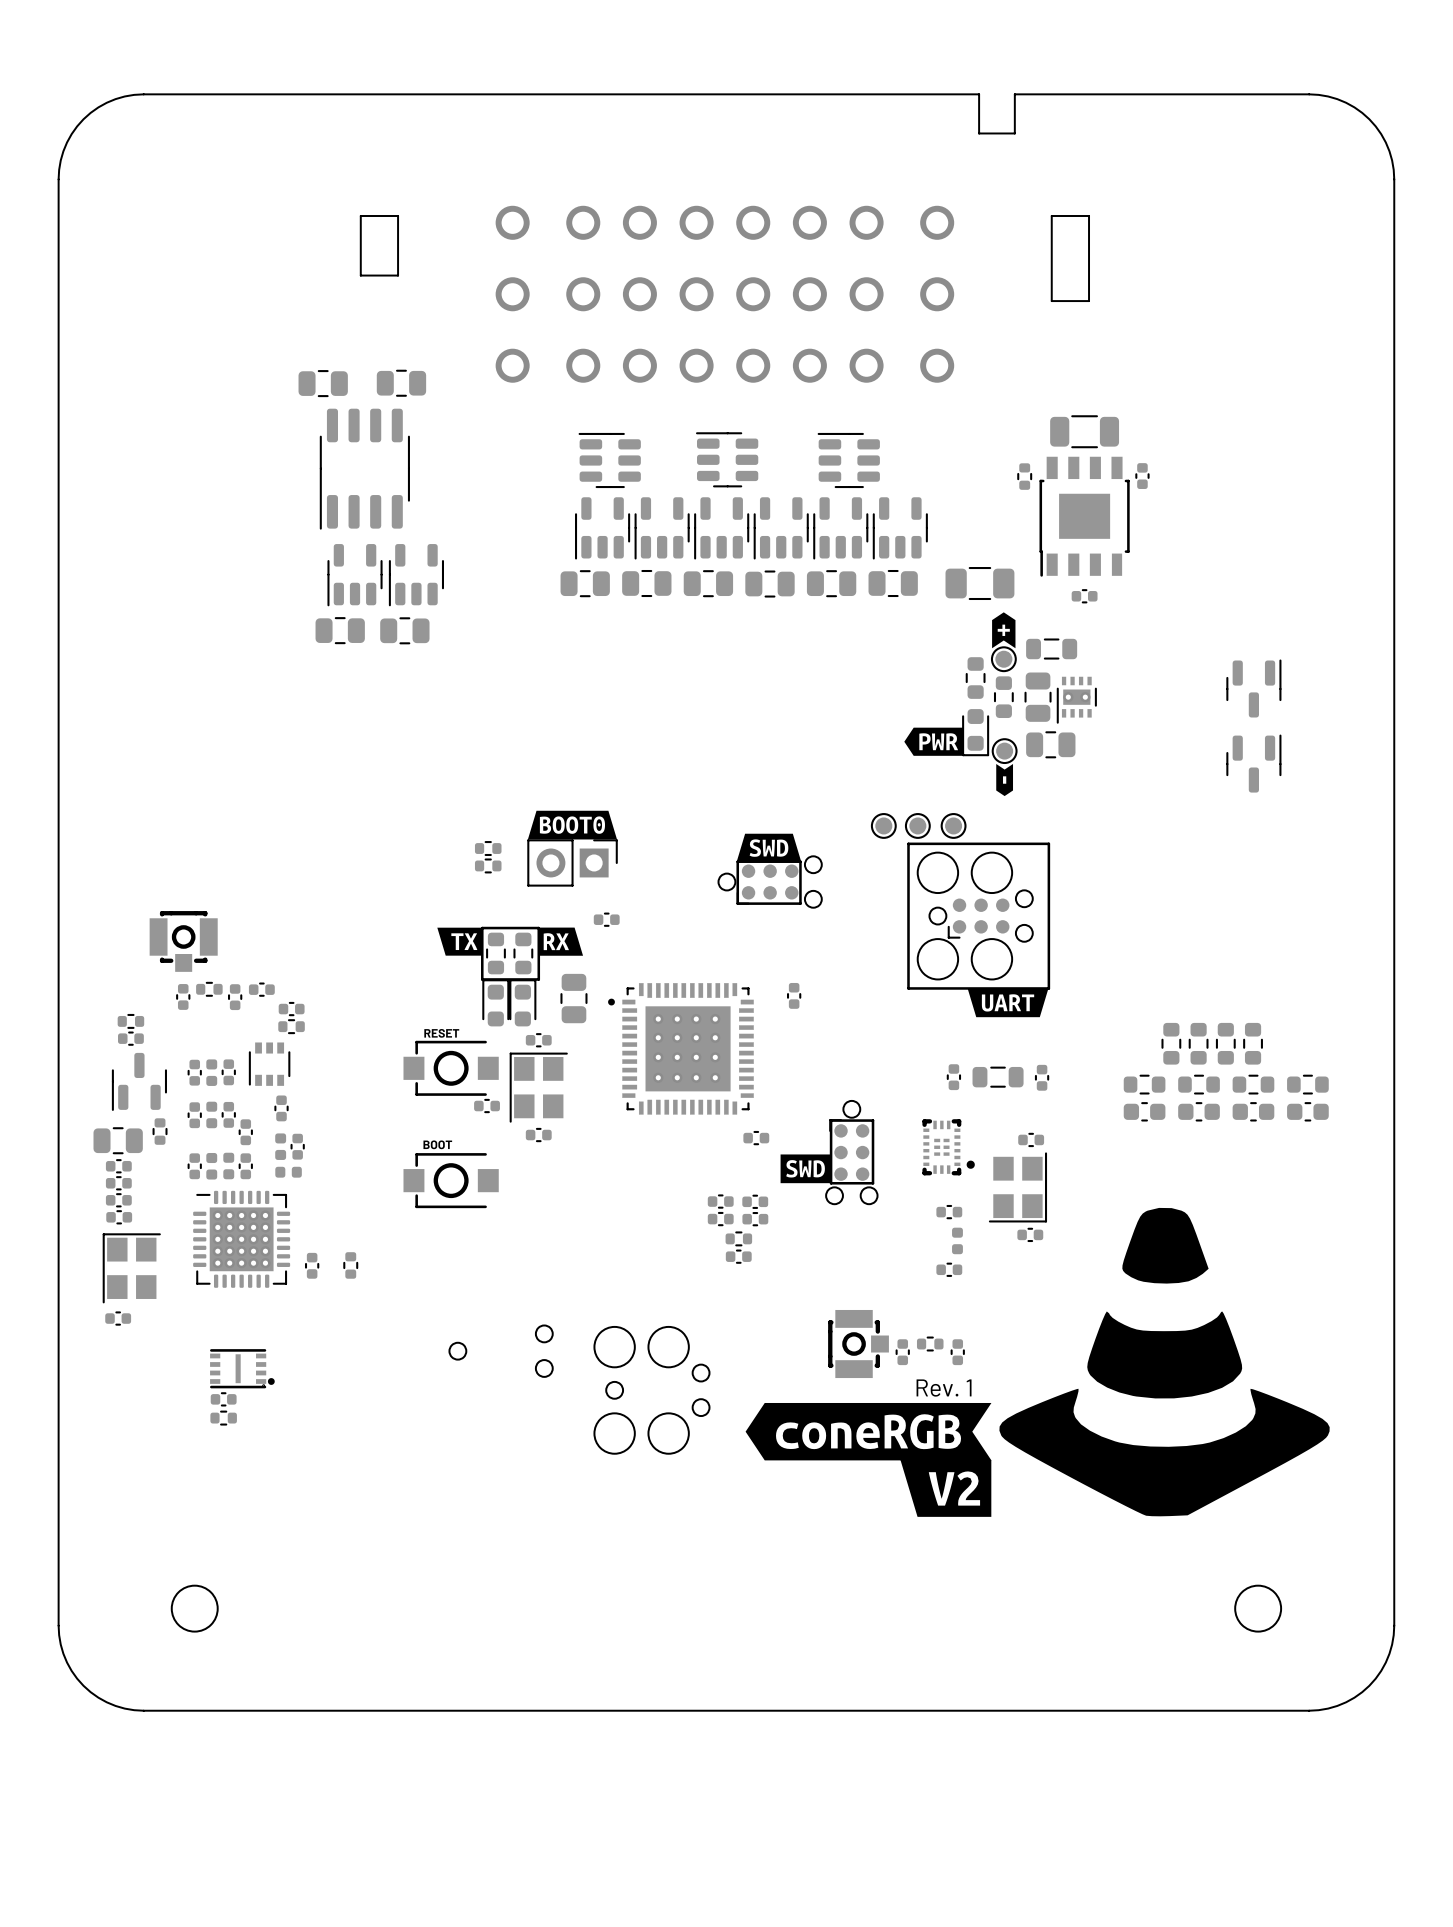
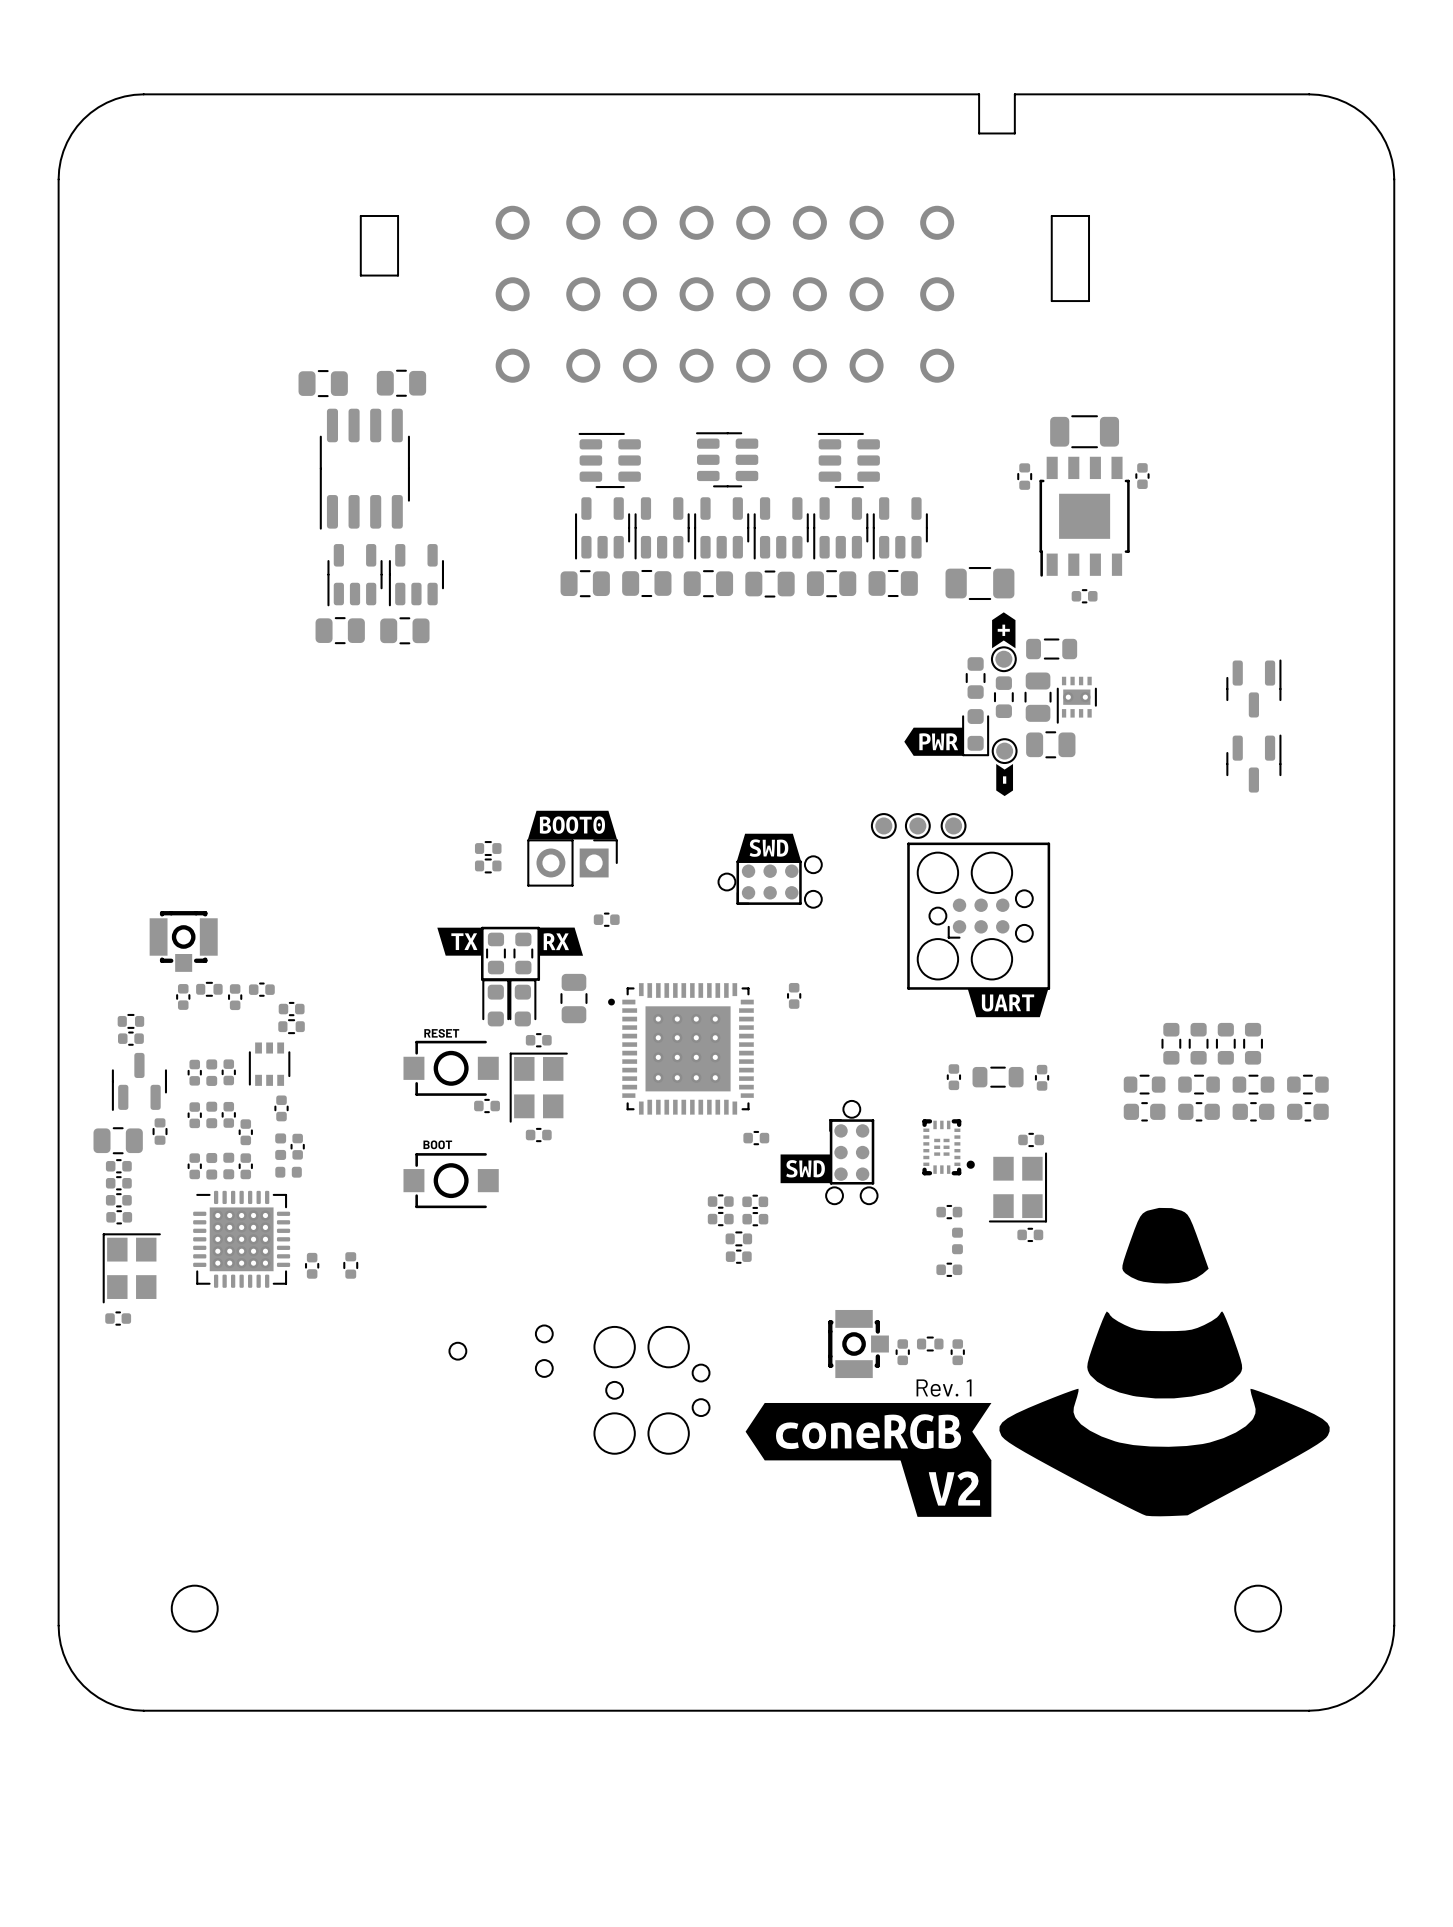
part: (242, 1368) -> none
part: (223, 1399) -> none
part: (223, 1418) -> none

